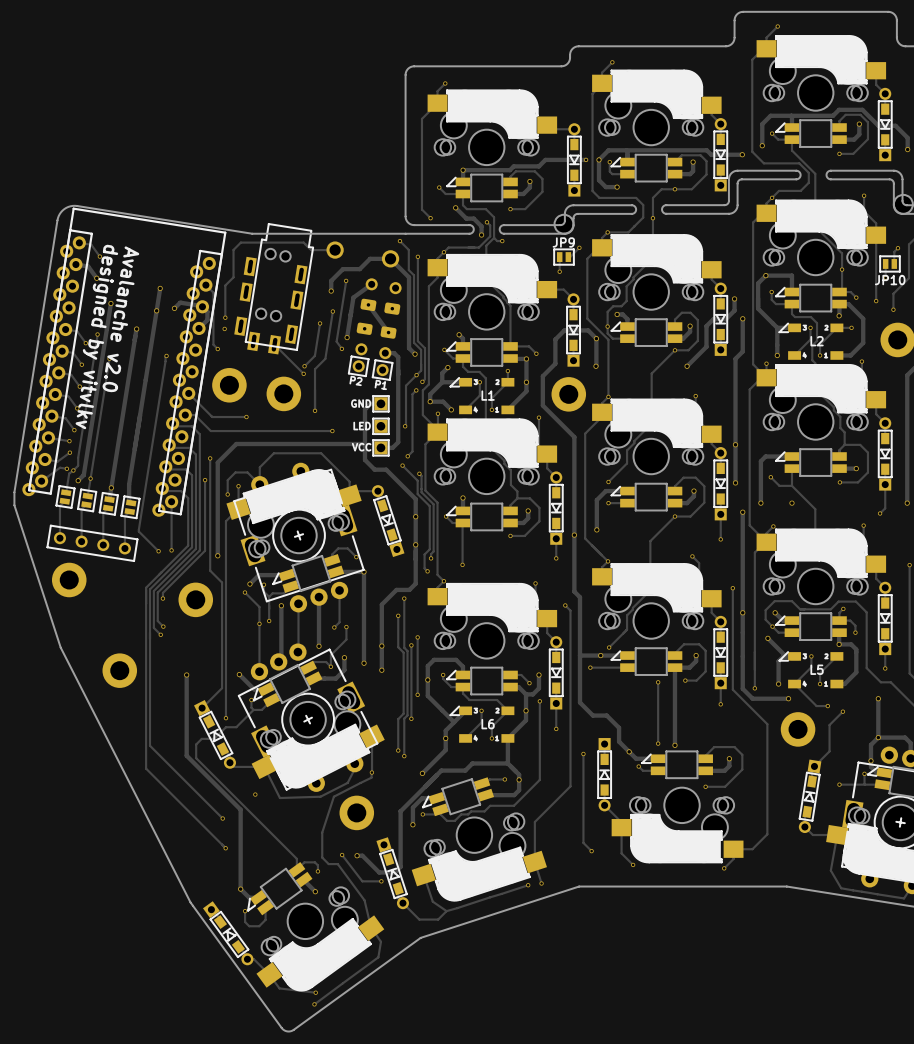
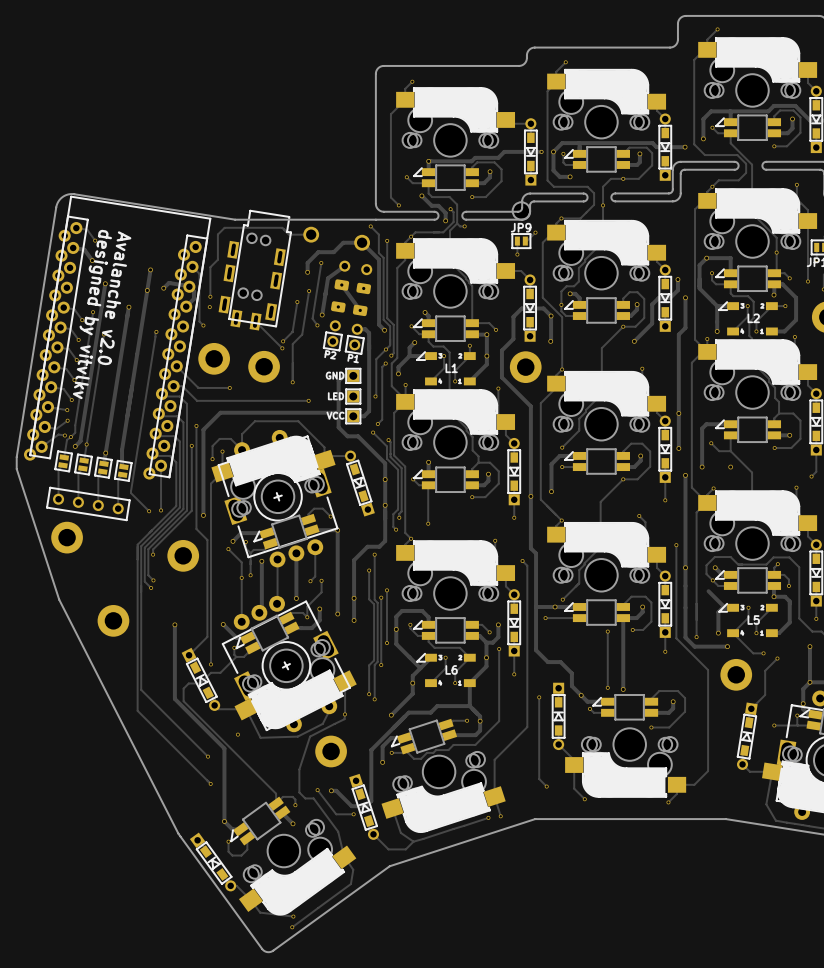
track: (430, 401) (443, 401) (451, 409) -> none
via: (451, 409) -> none
via: (767, 638) -> none

